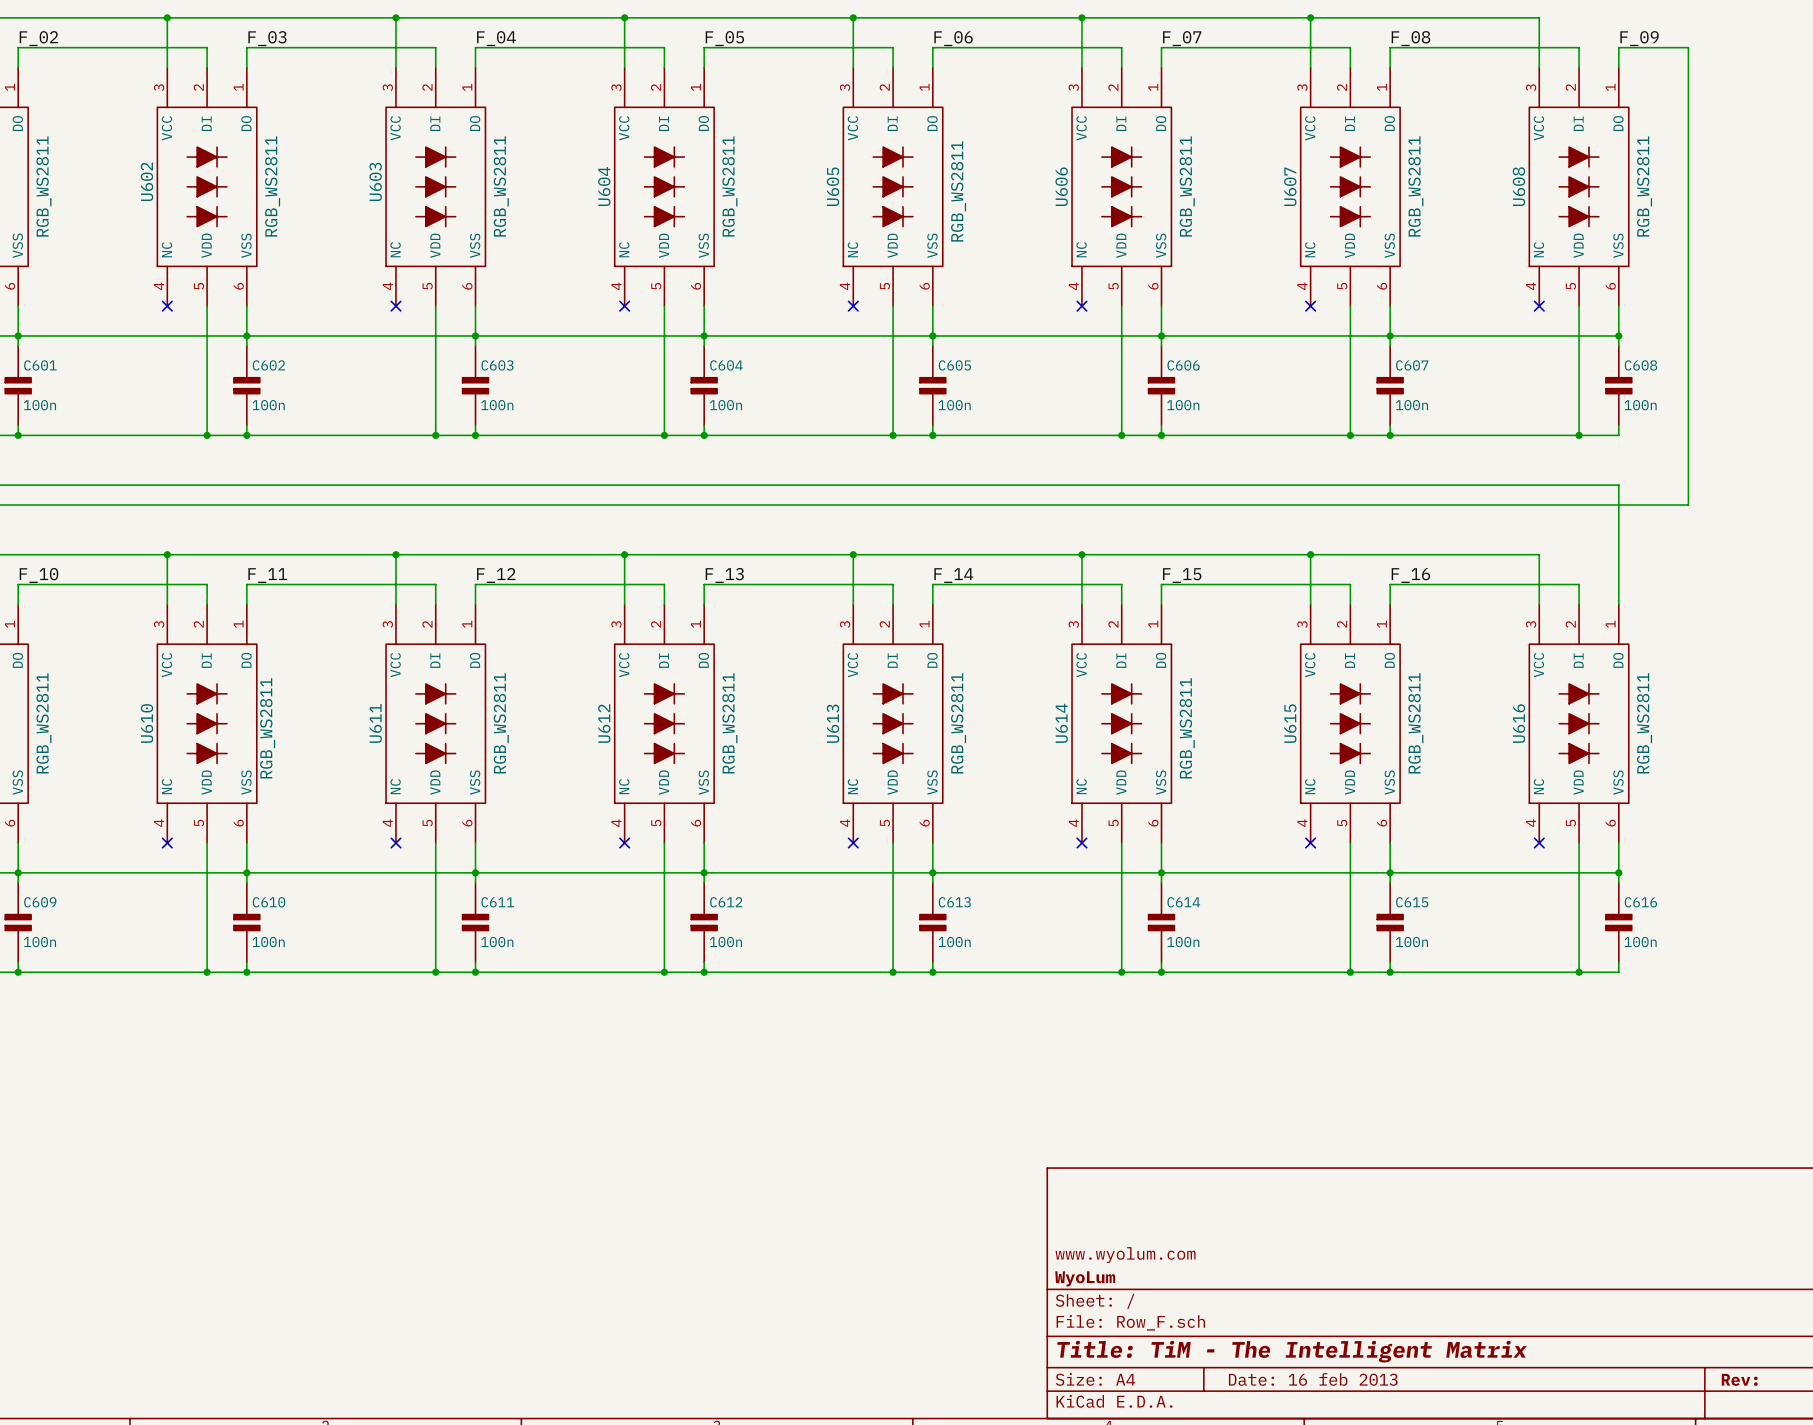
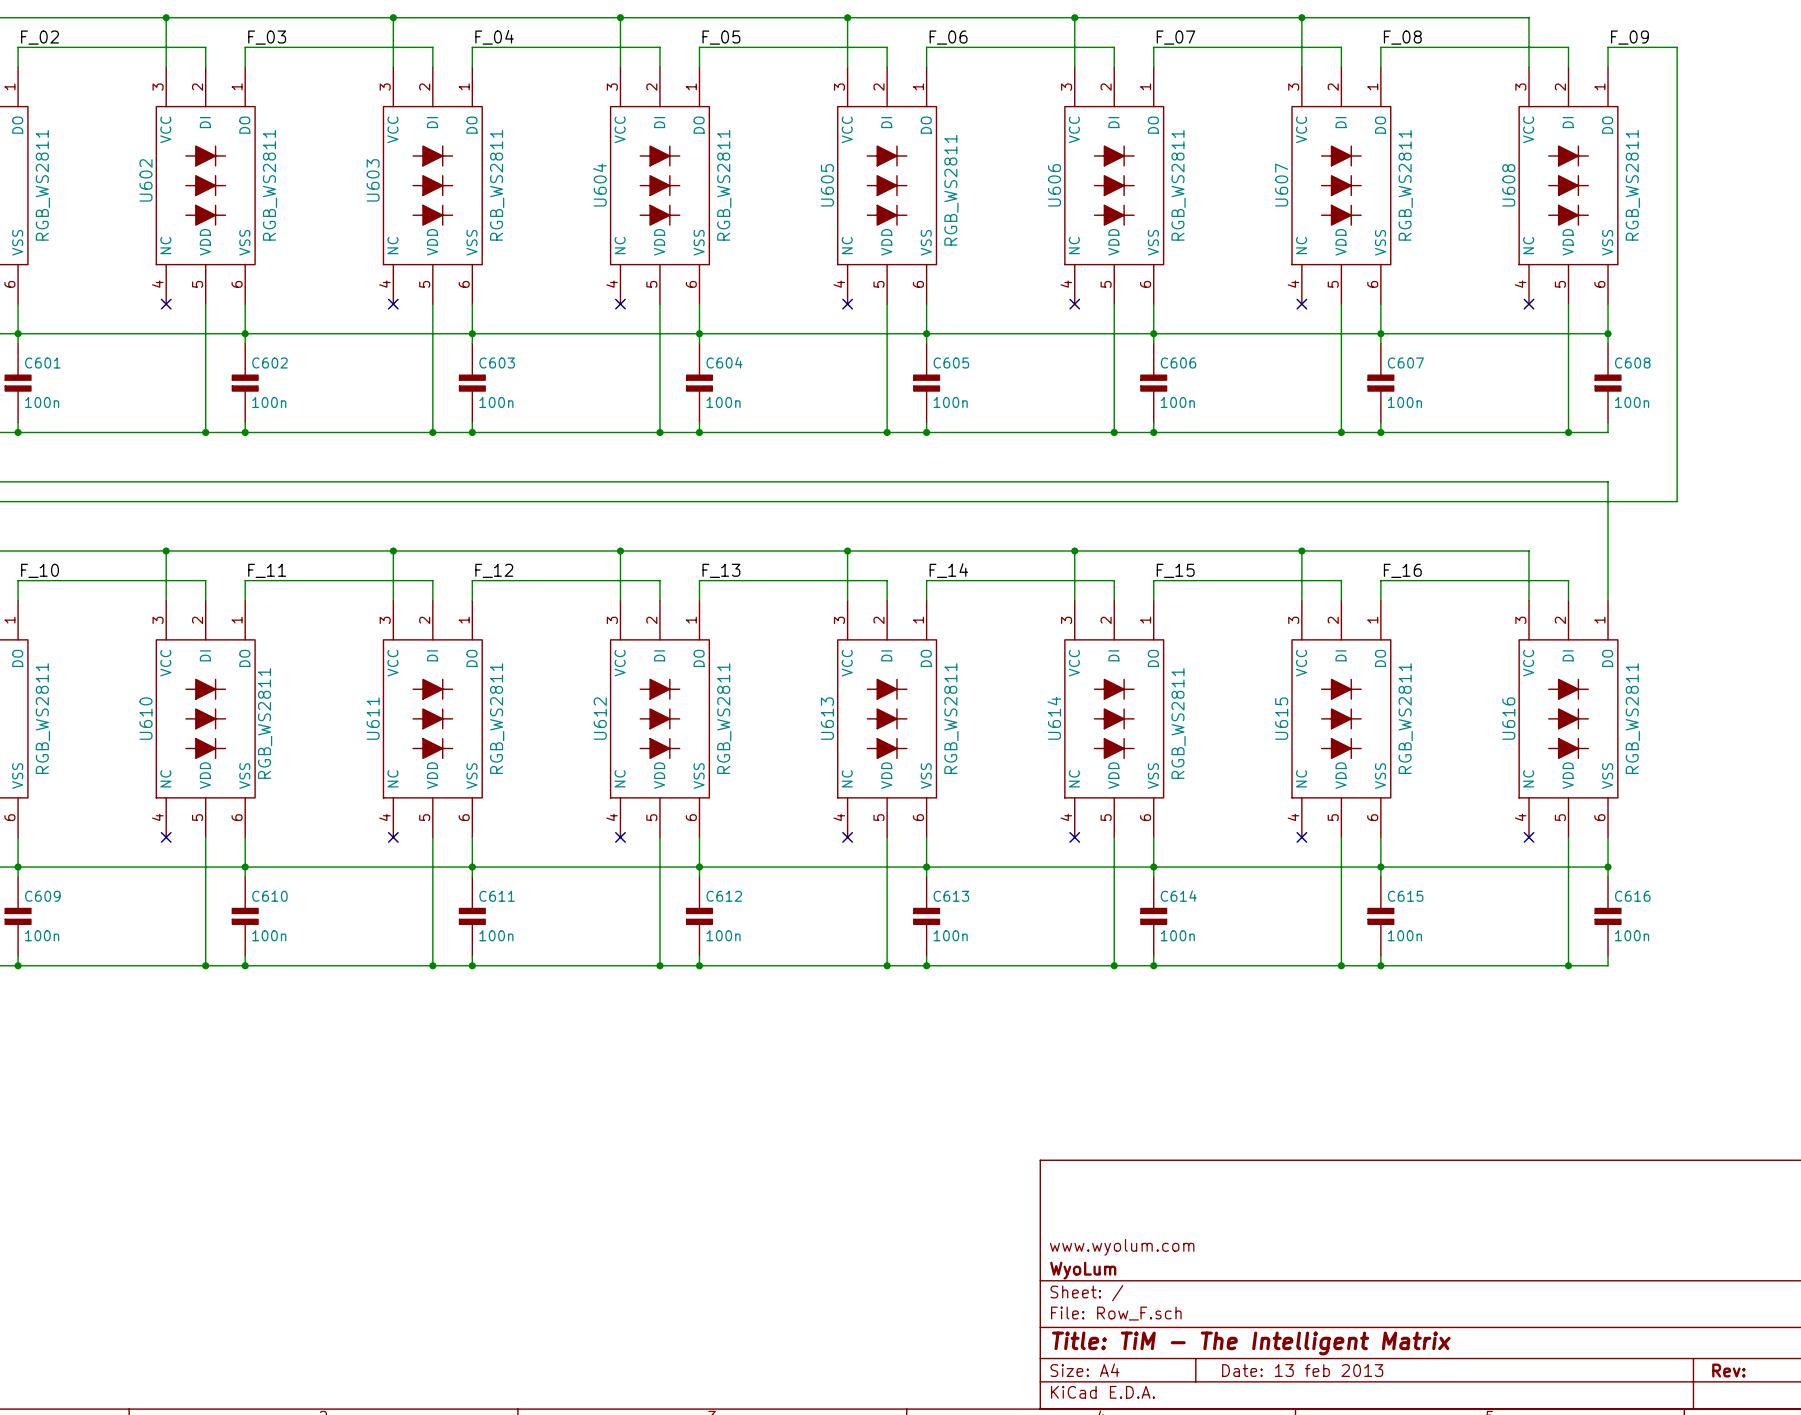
title block: Date: 16 feb 2013 (1313, 1379) -> Date: 13 feb 2013 (1302, 1370)

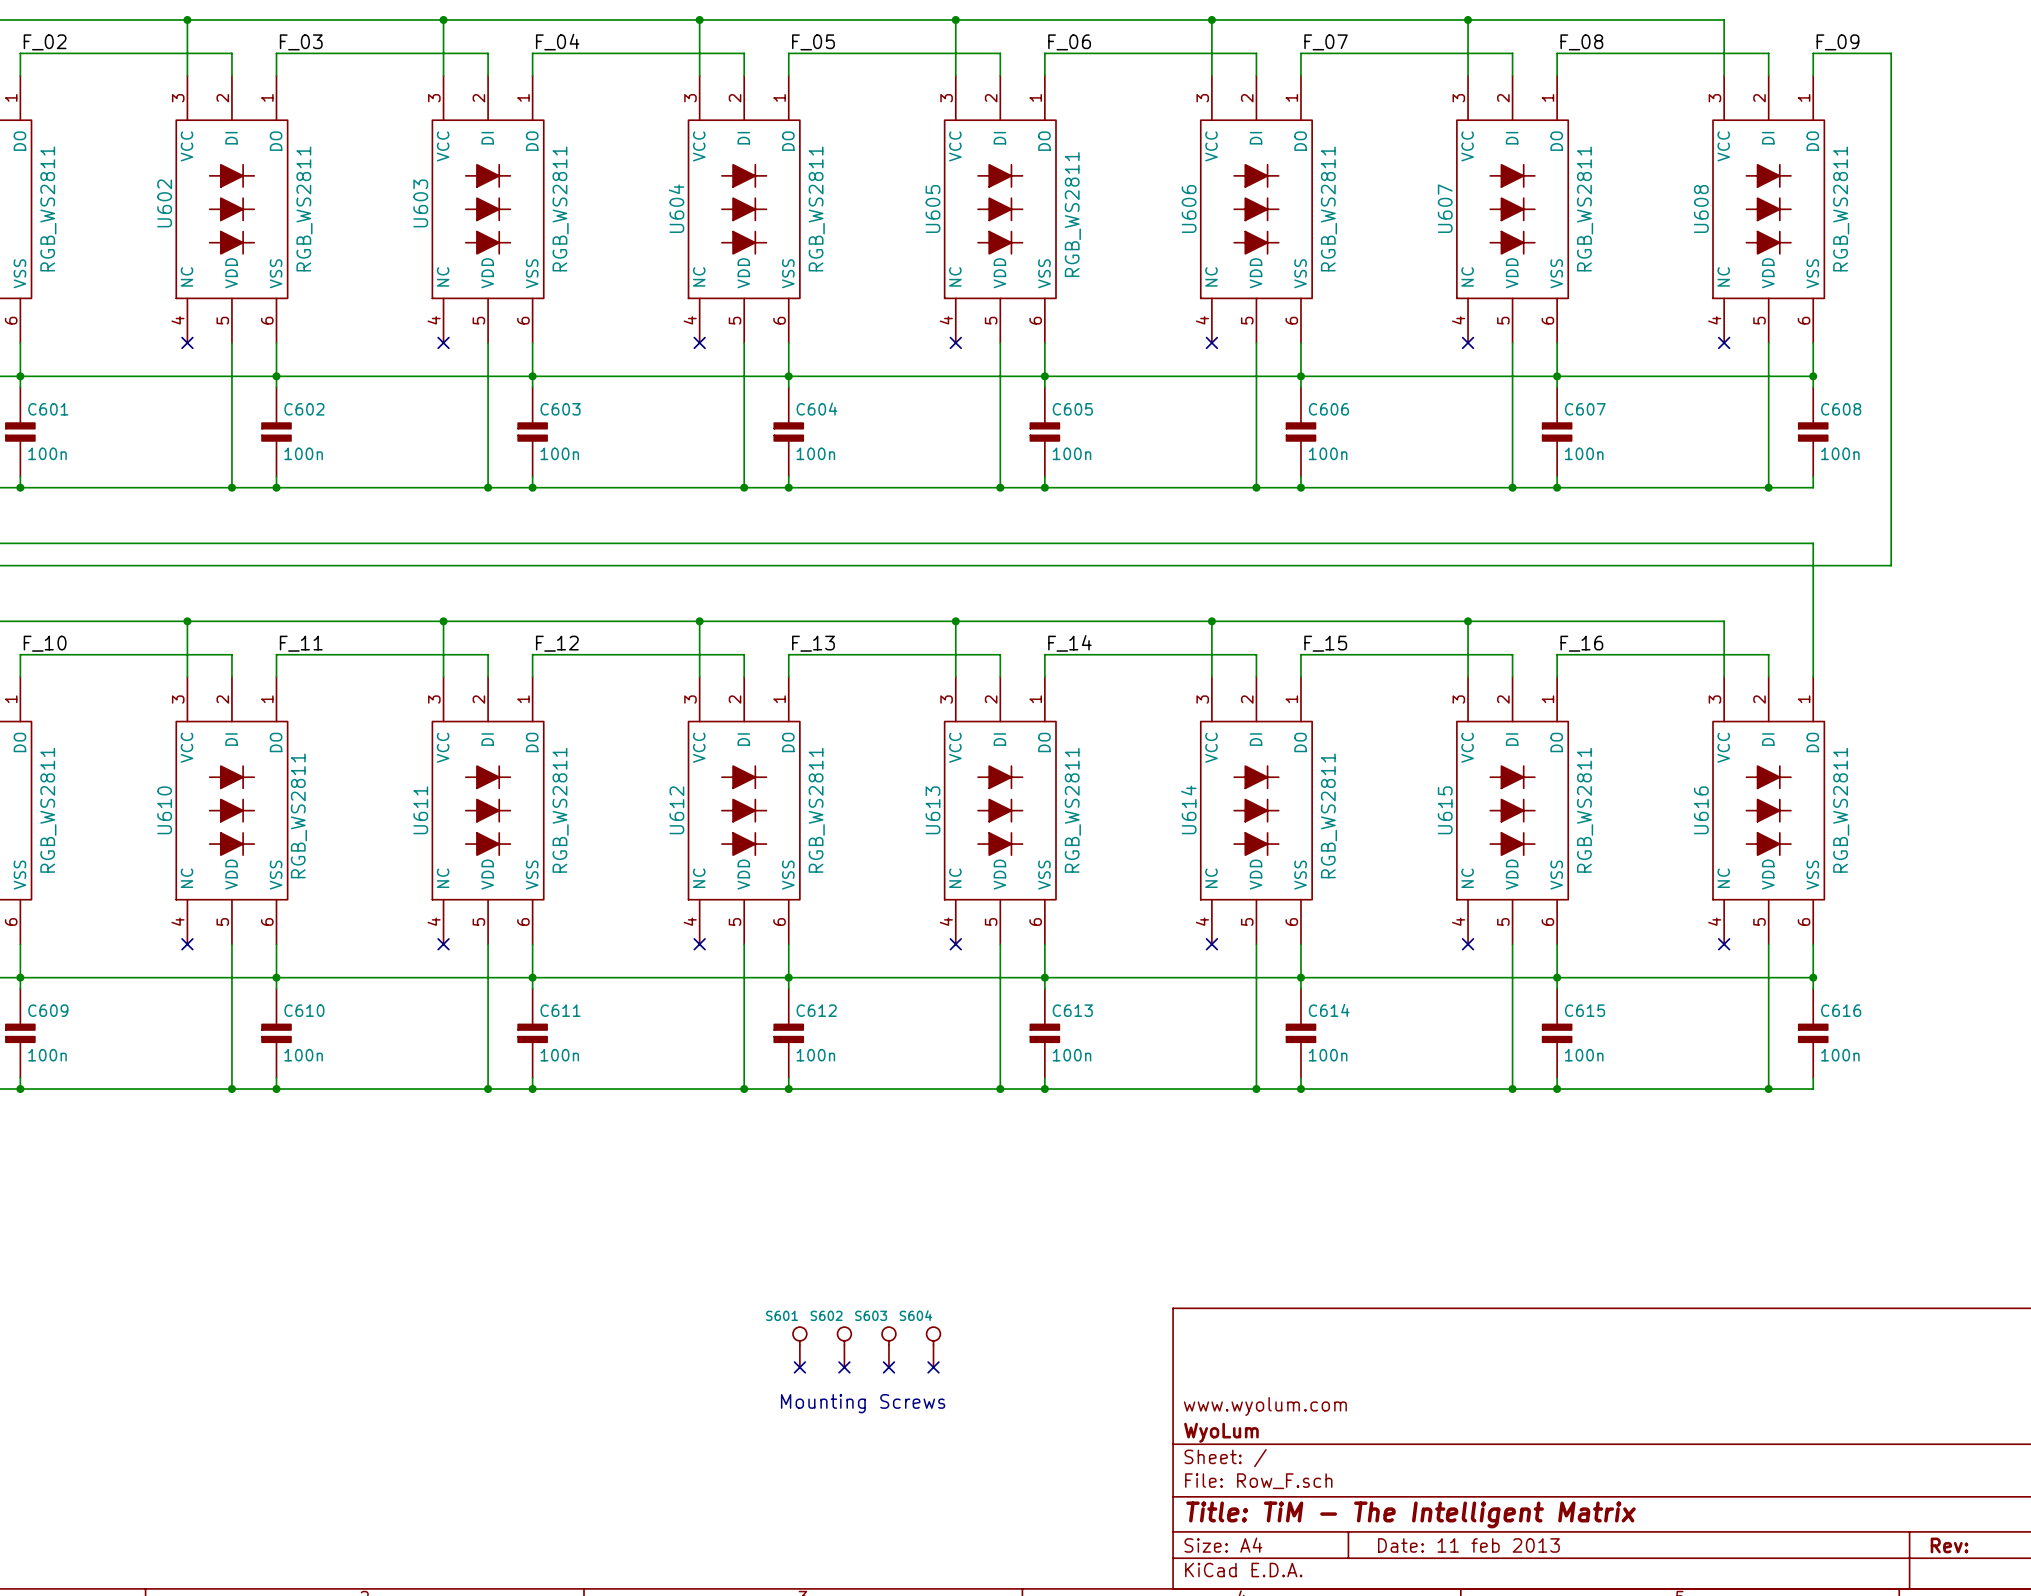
S601: none -> (799, 1347)
S602: none -> (844, 1347)
S603: none -> (888, 1347)
S604: none -> (933, 1347)
no-connect mark: none -> (799, 1367)
no-connect mark: none -> (844, 1367)
no-connect mark: none -> (888, 1367)
no-connect mark: none -> (933, 1367)
text: none -> Mounting Screws (863, 1403)
title block: Date: 13 feb 2013 (1302, 1370) -> Date: 11 feb 2013 (1468, 1545)

